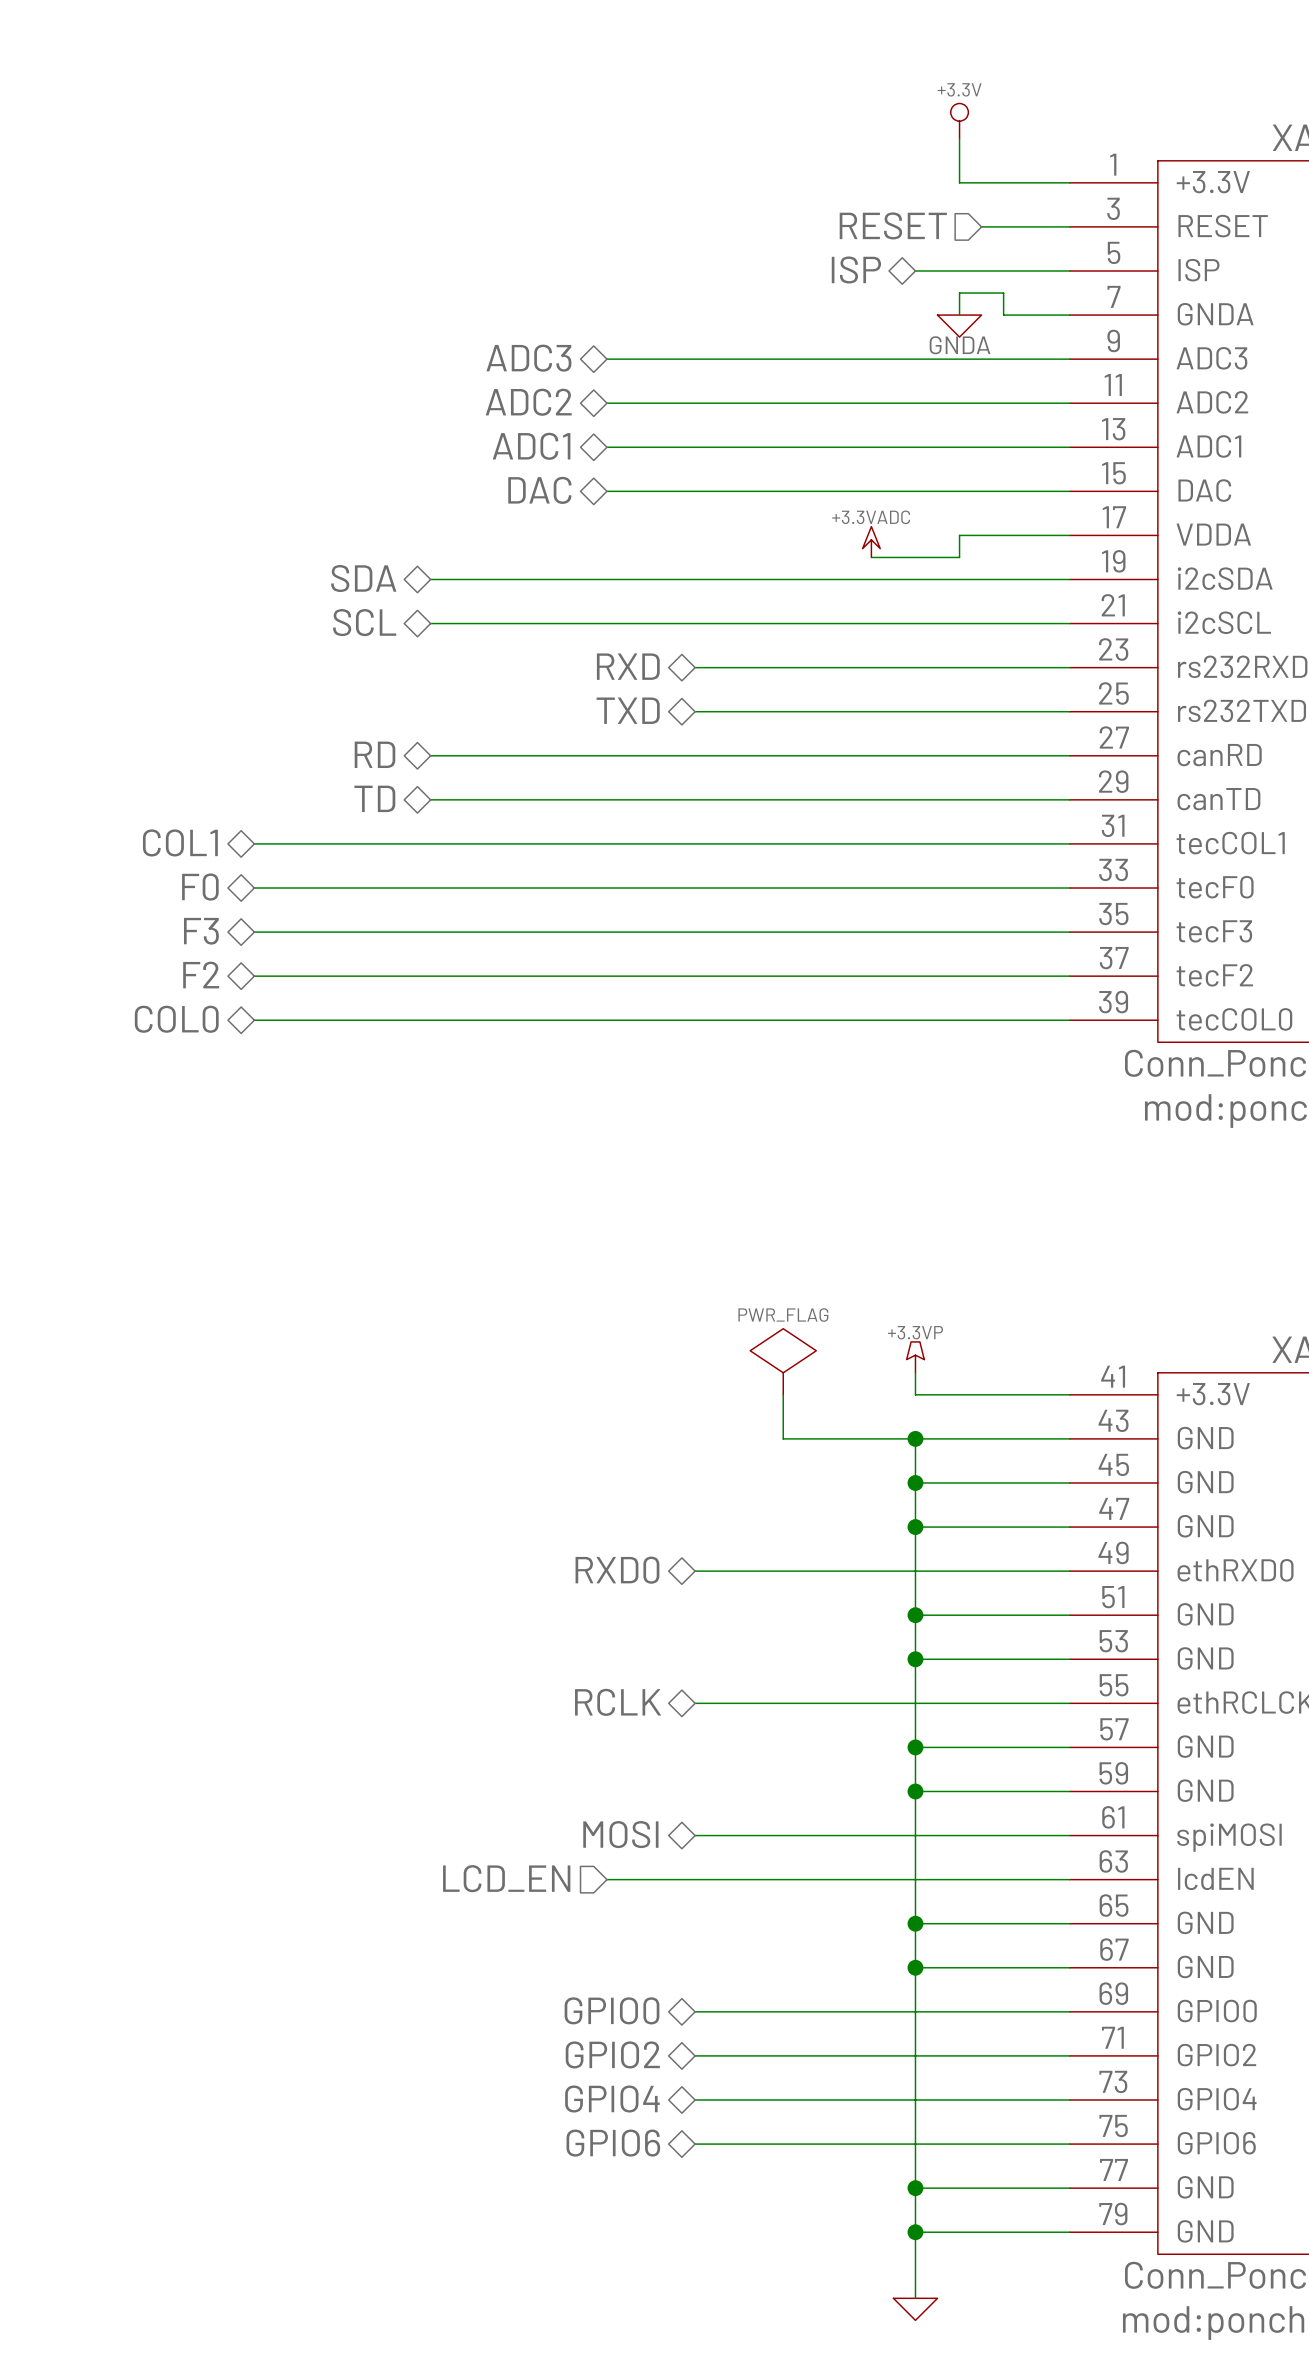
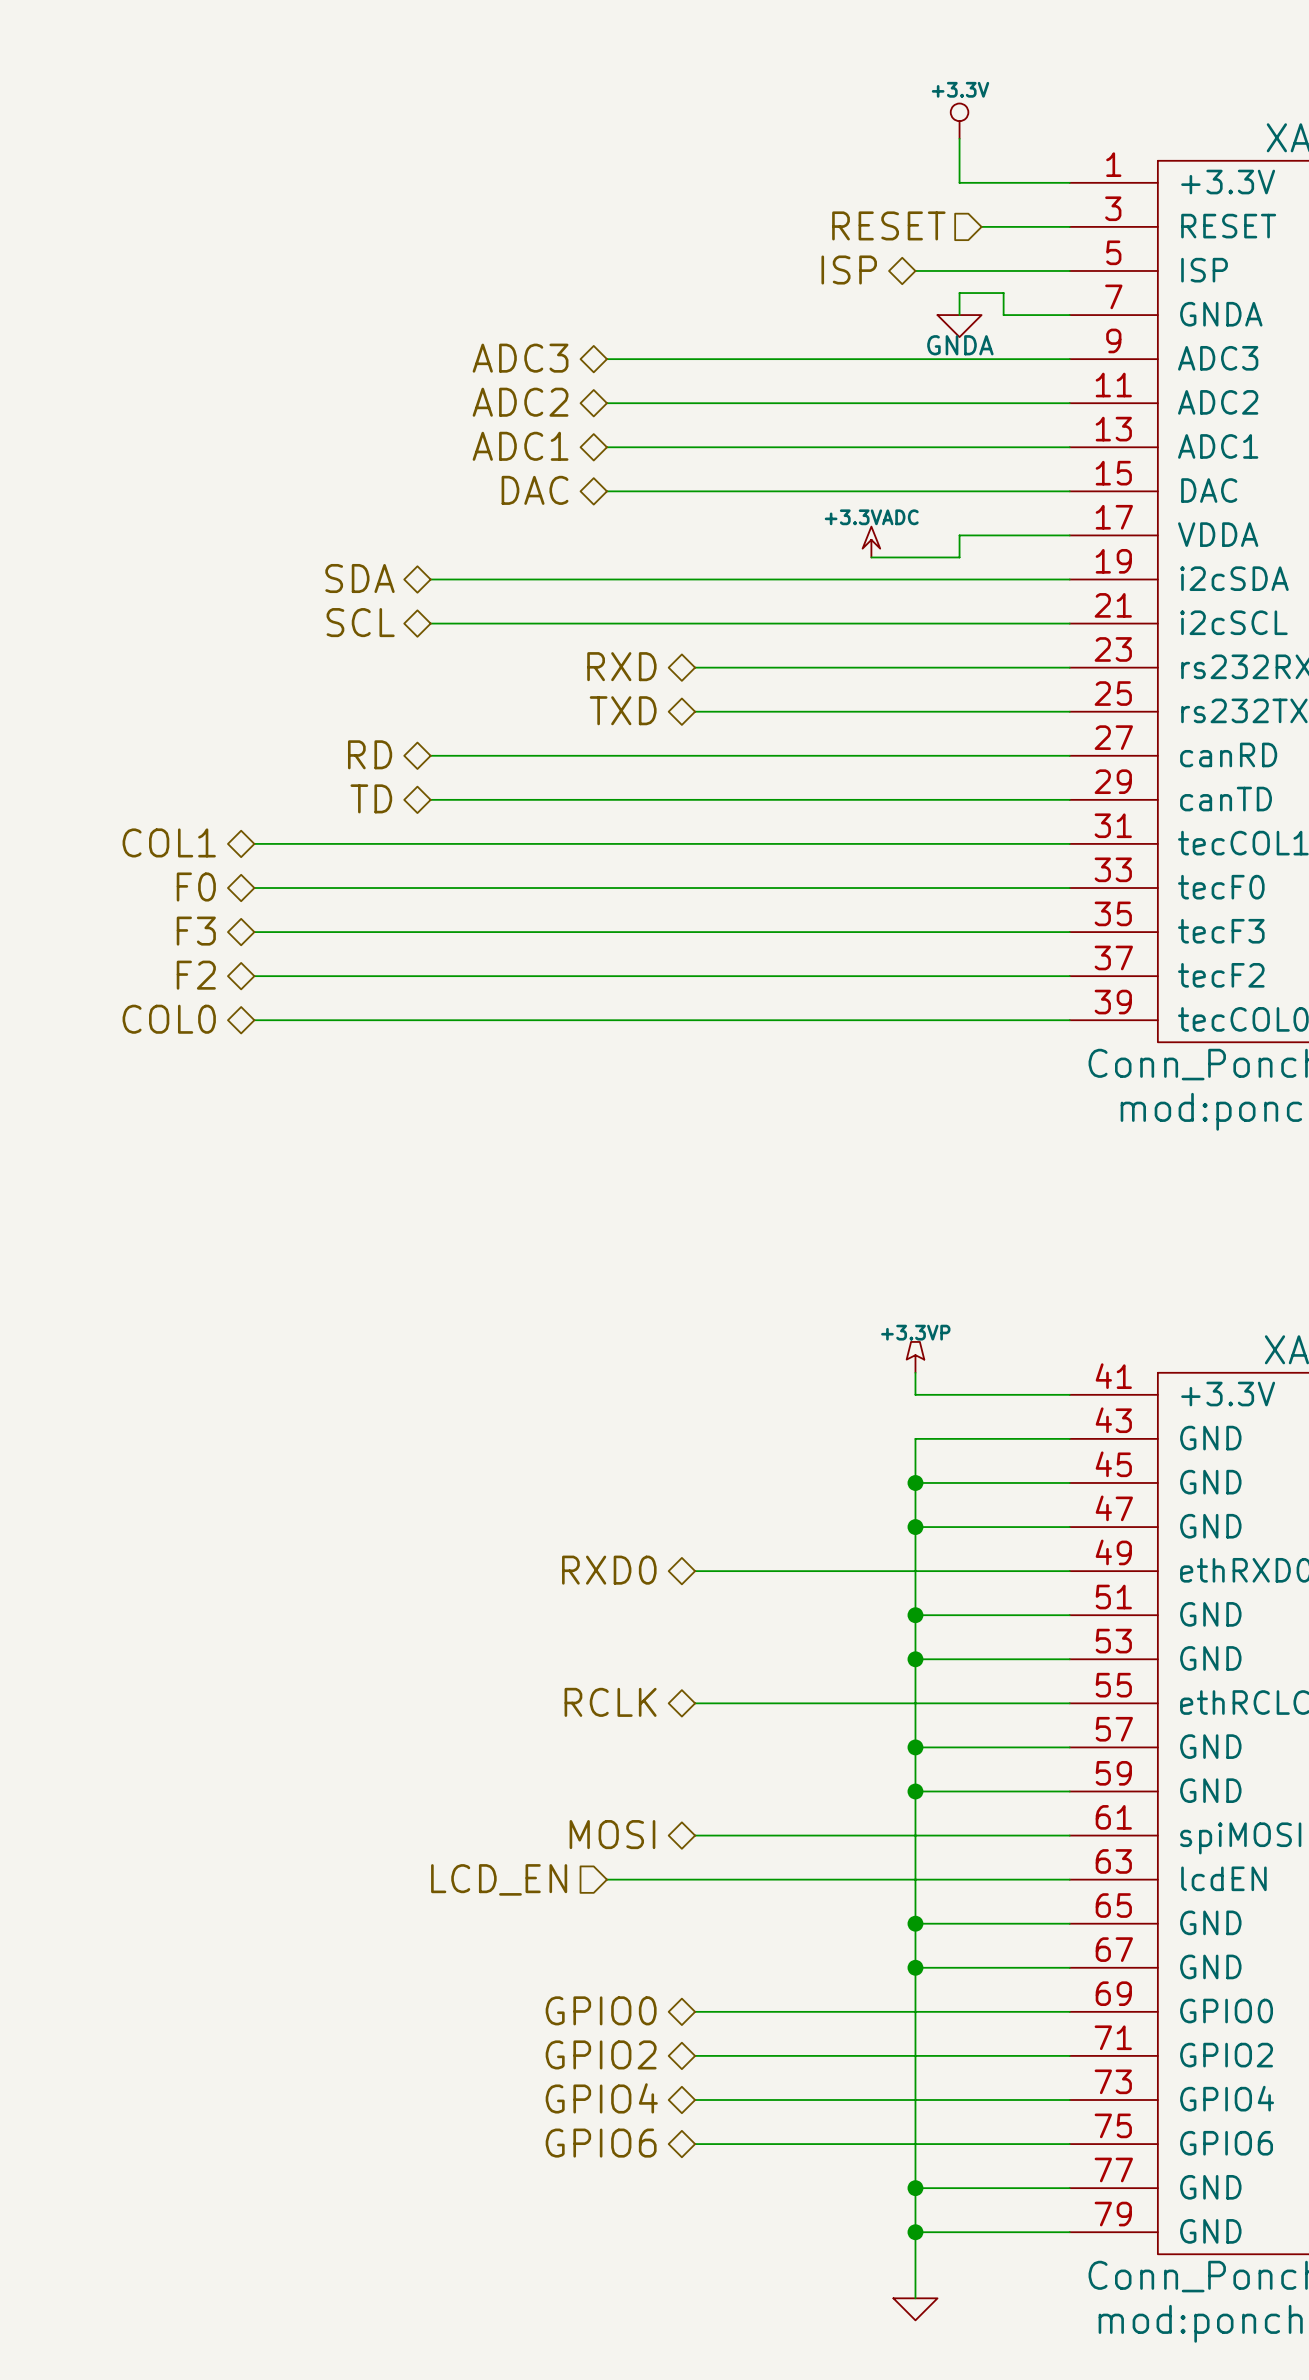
power symbol: PWR_FLAG (783, 1361) -> none
wire: (783, 1394) (783, 1438) (915, 1438) -> none
junction: (915, 1438) -> none

